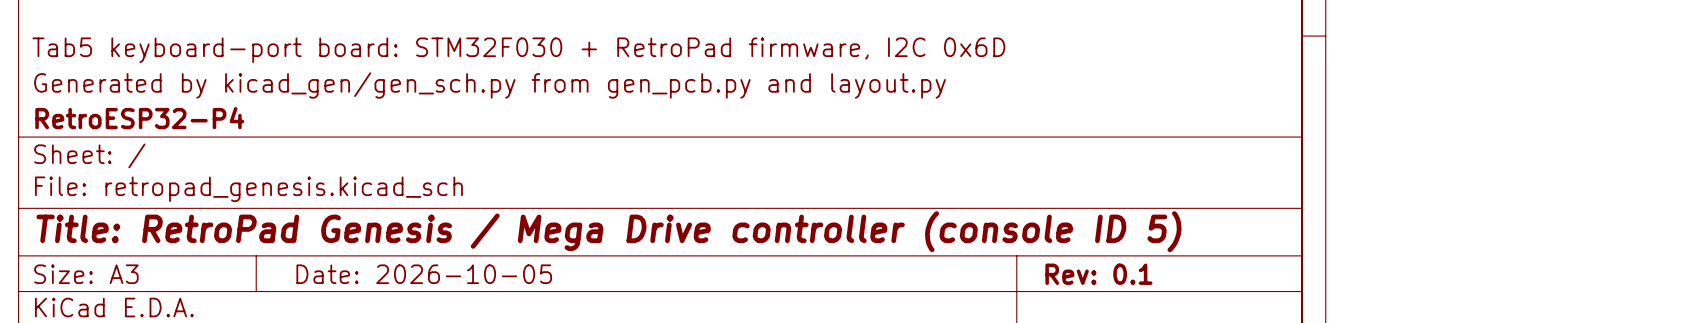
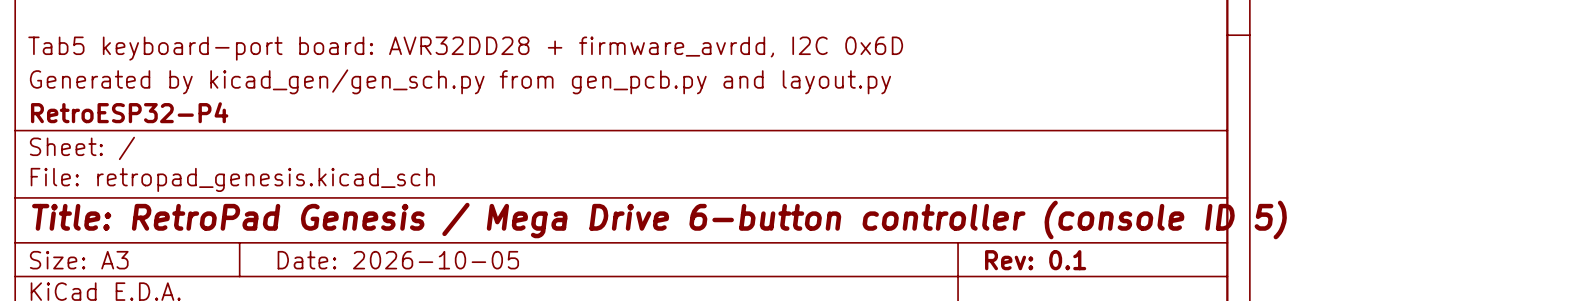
title block: Tab5 keyboard-port board: STM32F030 + RetroPad firmware, I2C 0x6D (518, 50) -> Tab5 keyboard-port board: AVR32DD28 + firmware_avrdd, I2C 0x6D (465, 48)
title block: Title: RetroPad Genesis / Mega Drive controller (console ID 5) (609, 231) -> Title: RetroPad Genesis / Mega Drive 6-button controller (console ID 5) (659, 219)

